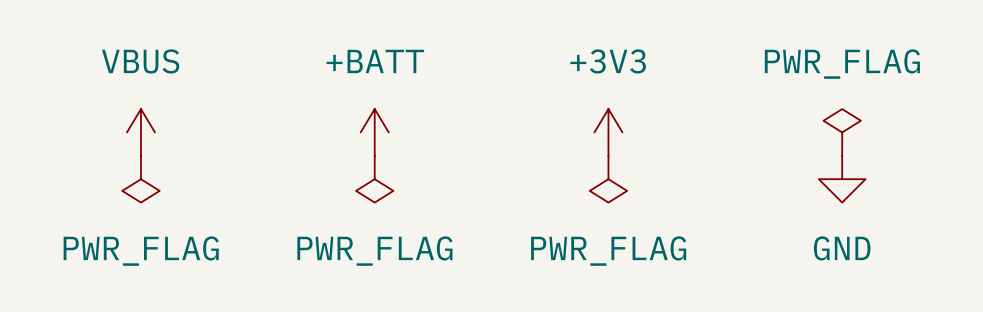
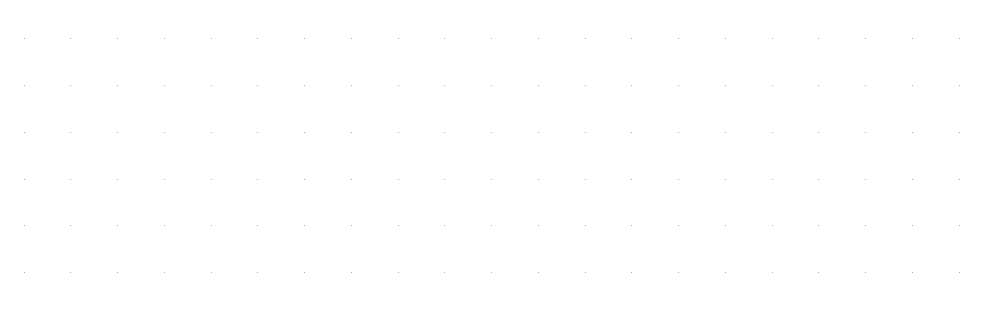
power symbol: VBUS (140, 132) -> none
power symbol: +BATT (374, 132) -> none
power symbol: +3V3 (608, 132) -> none
power symbol: PWR_FLAG (842, 132) -> none
power symbol: PWR_FLAG (140, 179) -> none
power symbol: PWR_FLAG (374, 179) -> none
power symbol: PWR_FLAG (608, 179) -> none
power symbol: GND (842, 179) -> none

